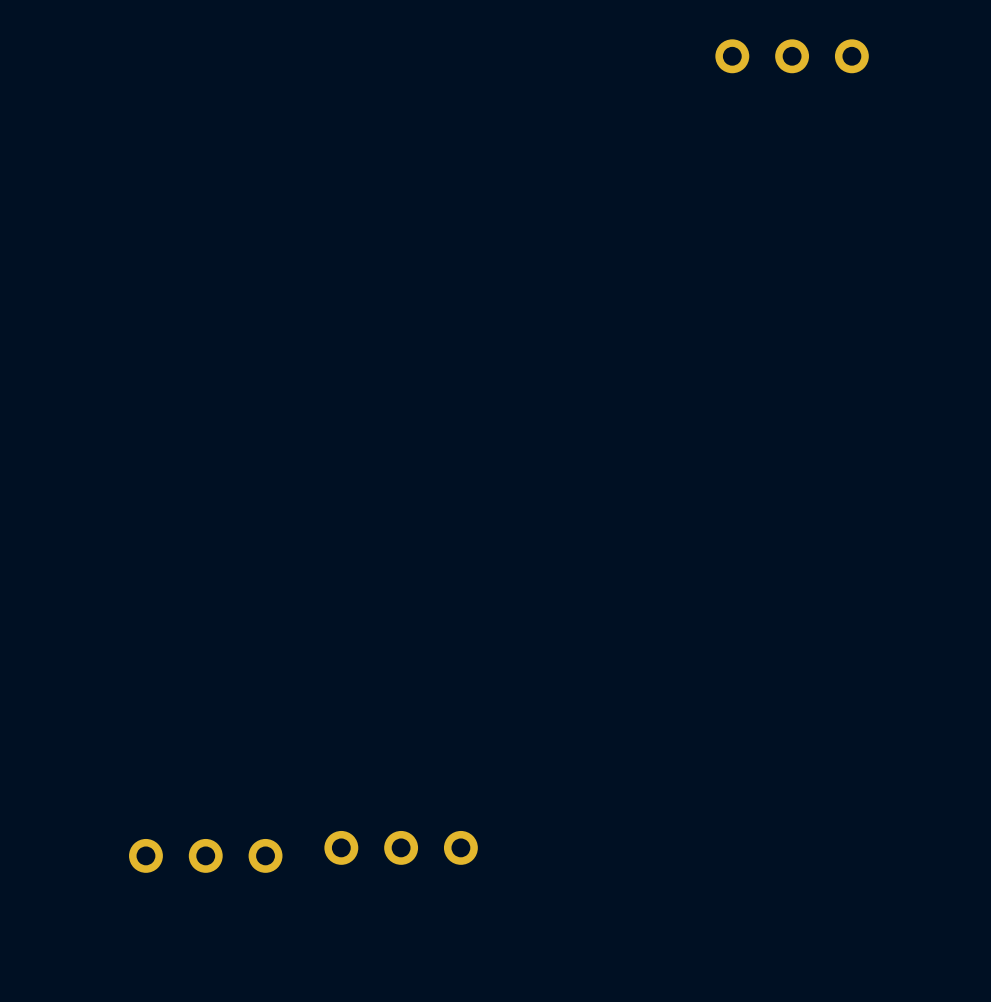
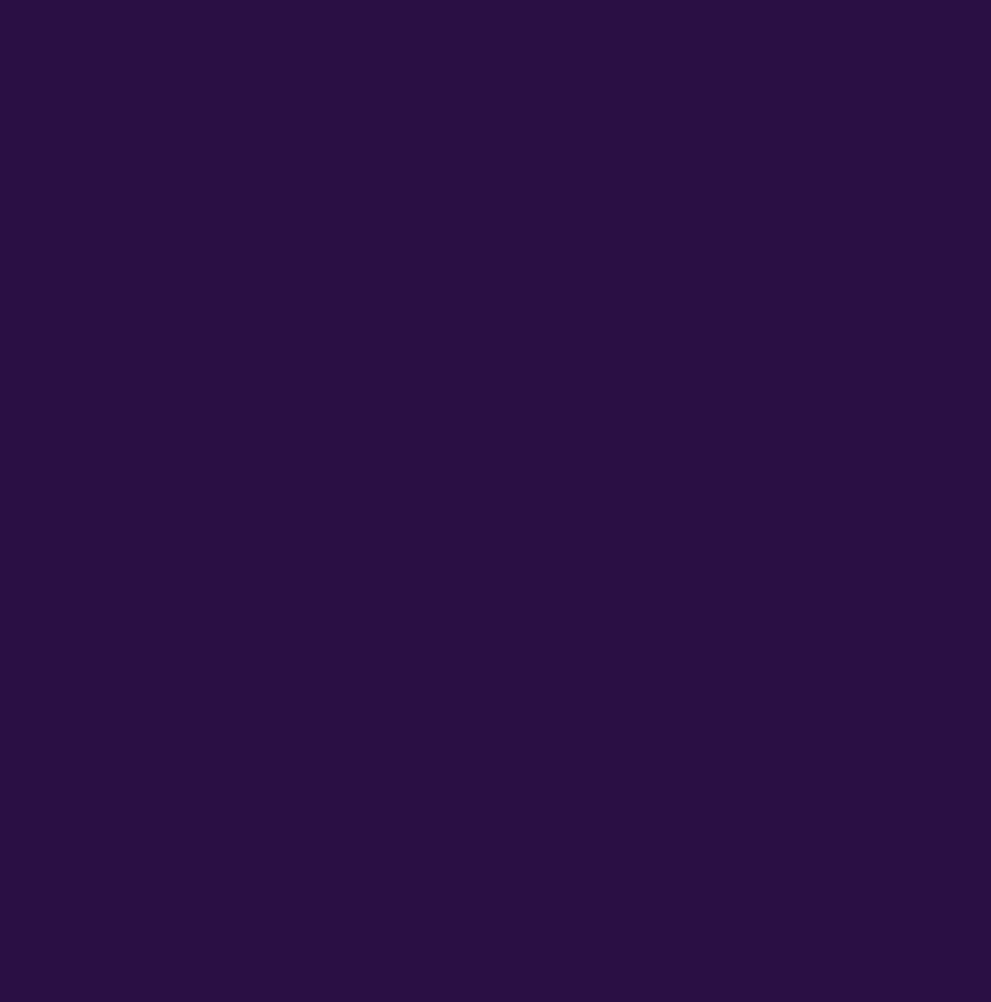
part: (792, 56) -> none
part: (401, 847) -> none
part: (205, 855) -> none

